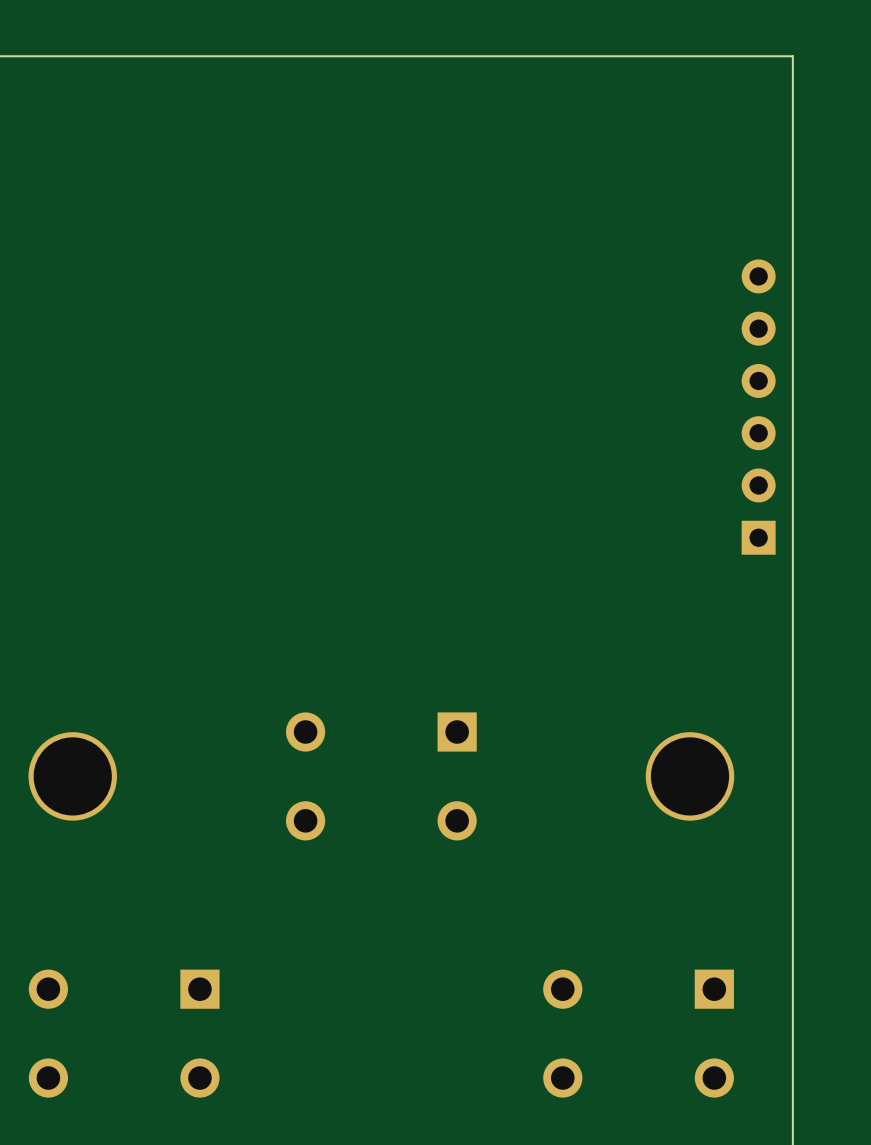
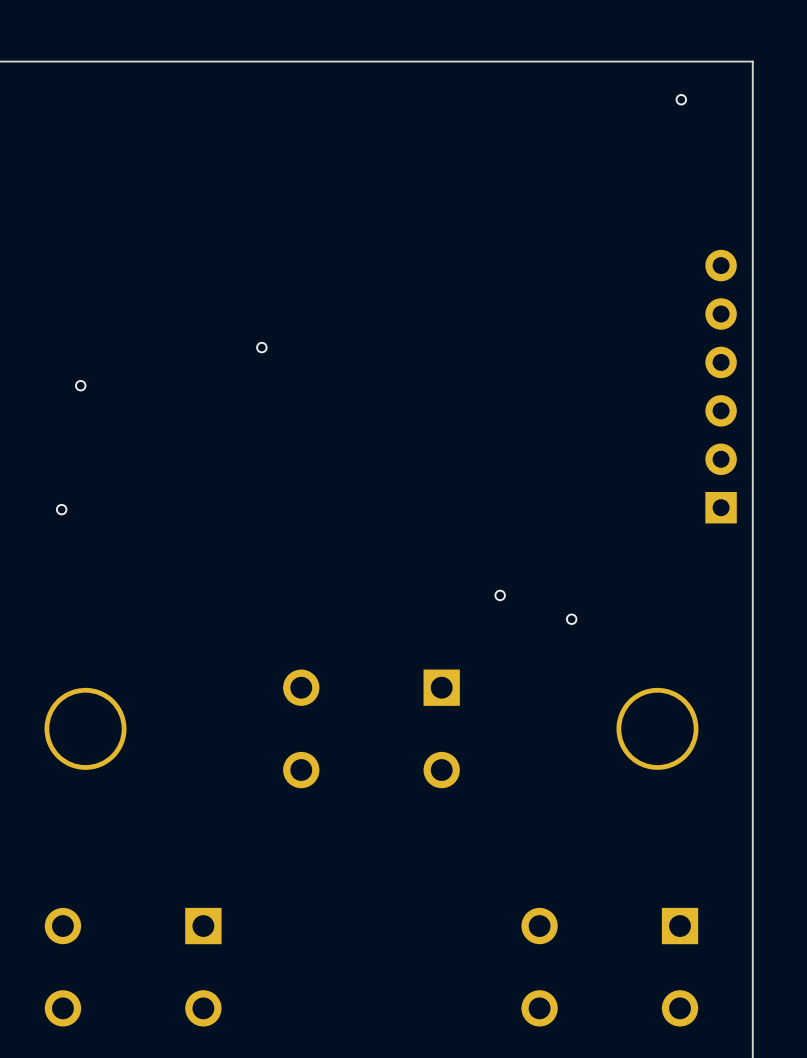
via: none -> (681, 99)
via: none -> (261, 347)
via: none -> (80, 385)
via: none -> (61, 509)
via: none -> (500, 595)
via: none -> (571, 619)

